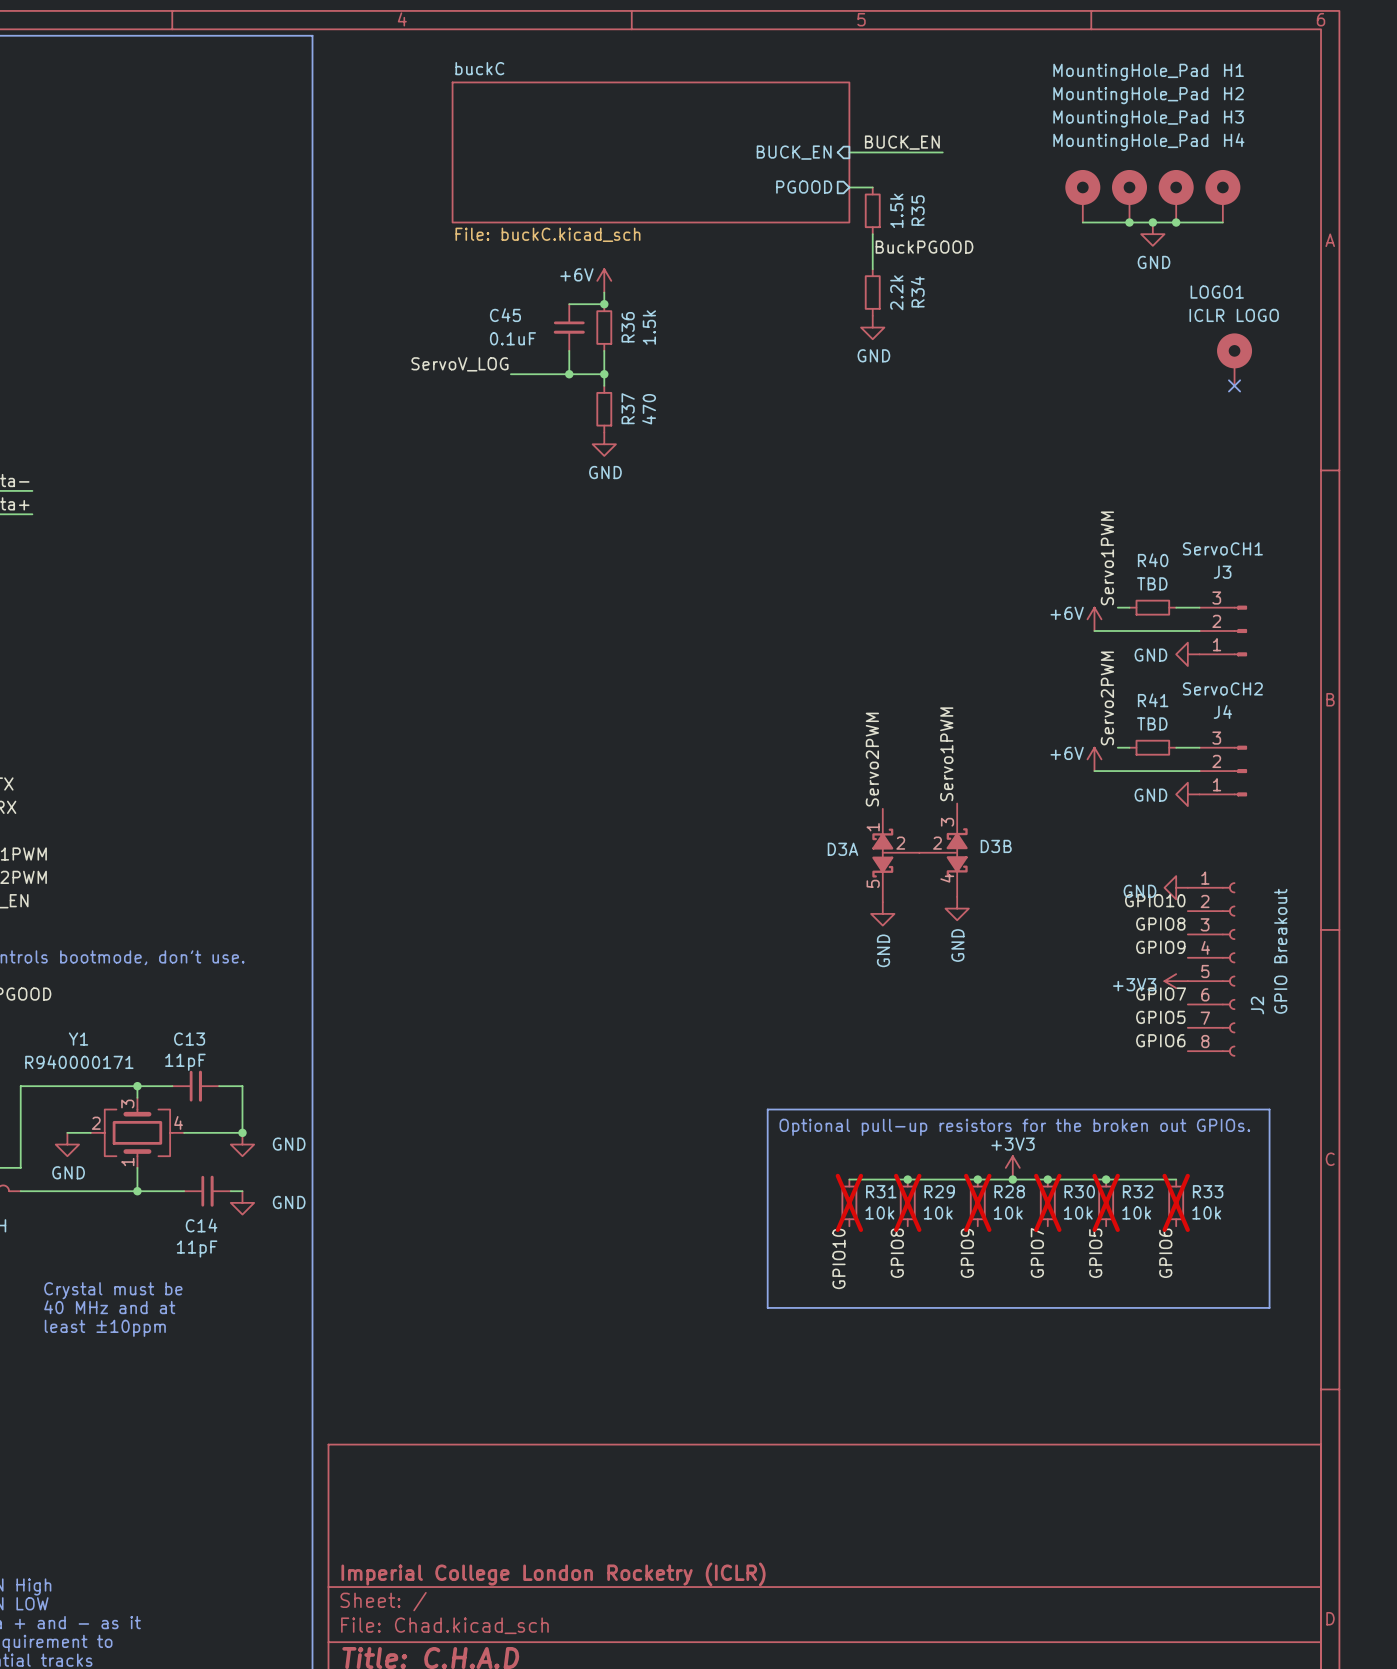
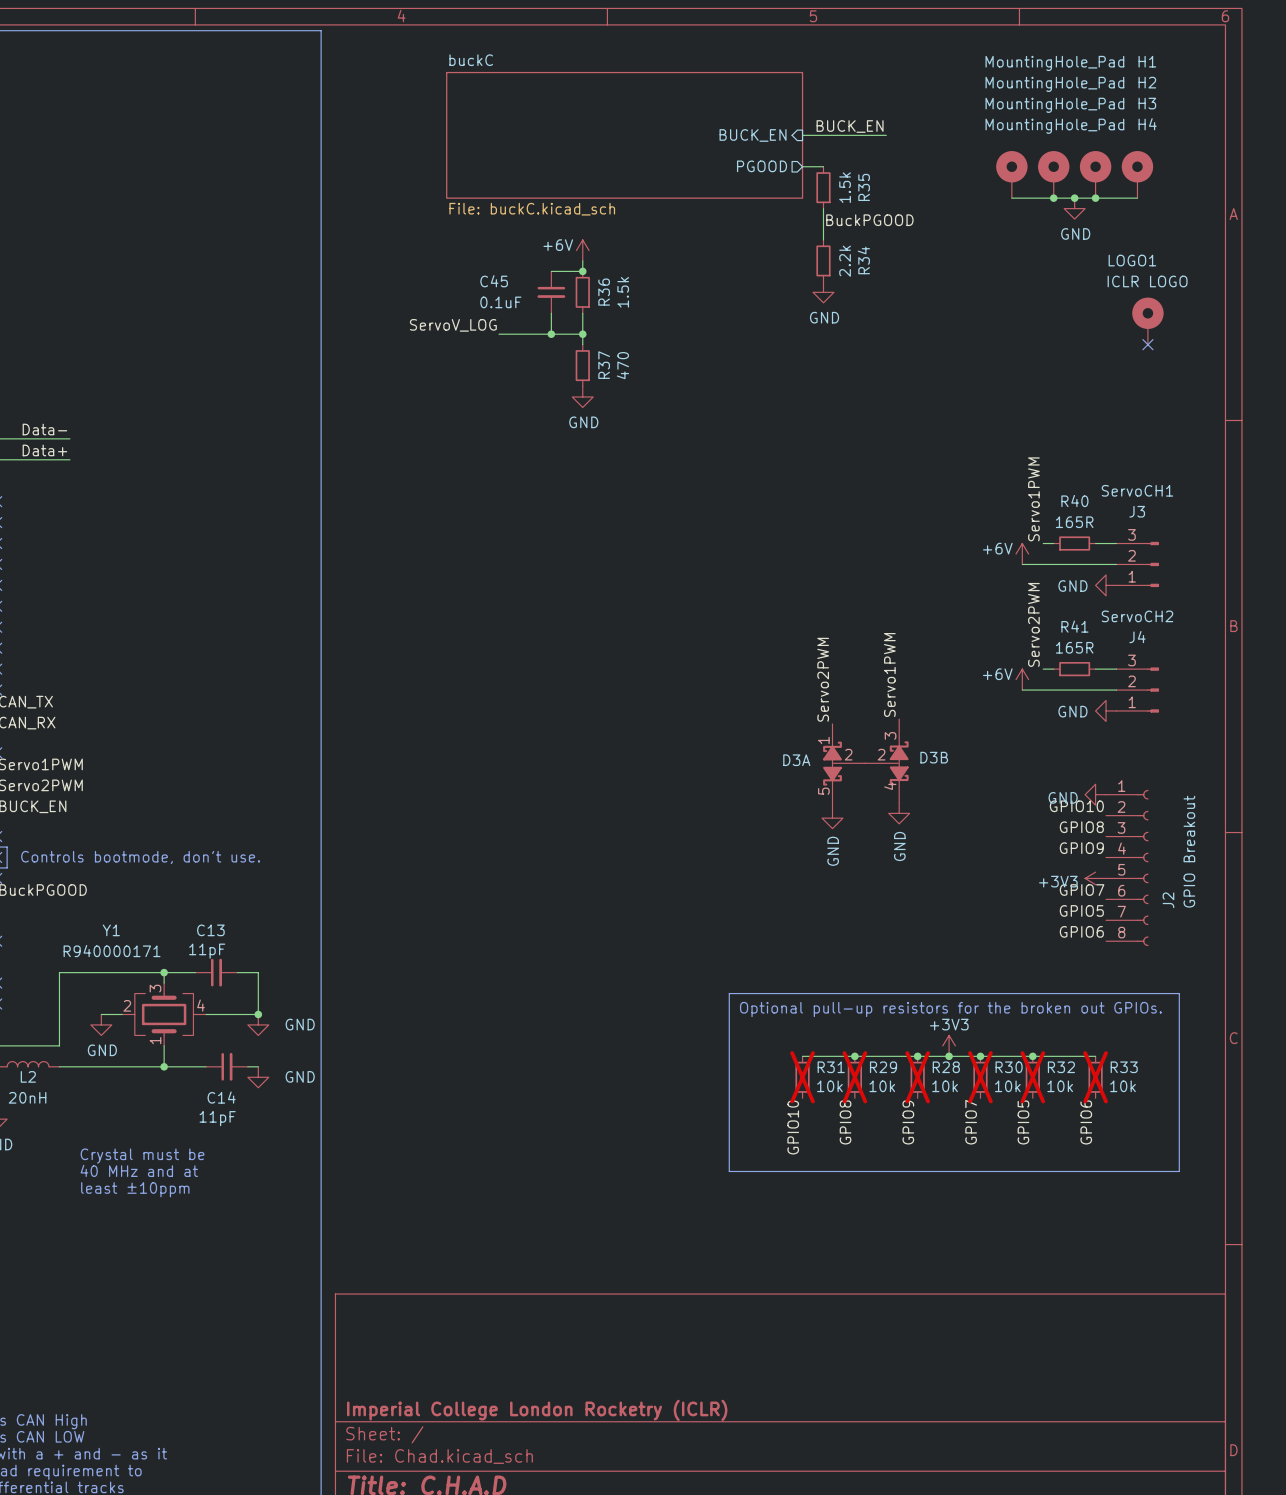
R40 value: TBD (1152, 583) -> 165R (1074, 522)
R41 value: TBD (1152, 723) -> 165R (1074, 647)

